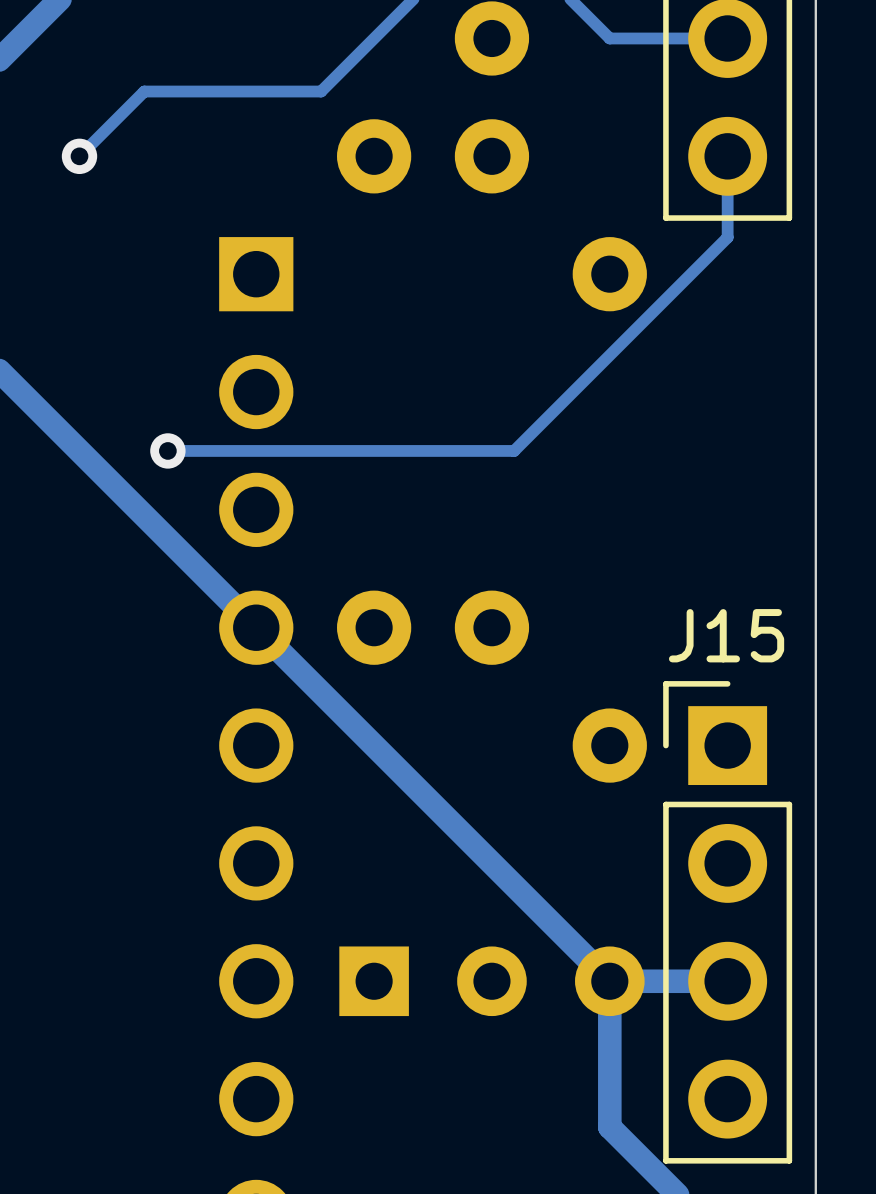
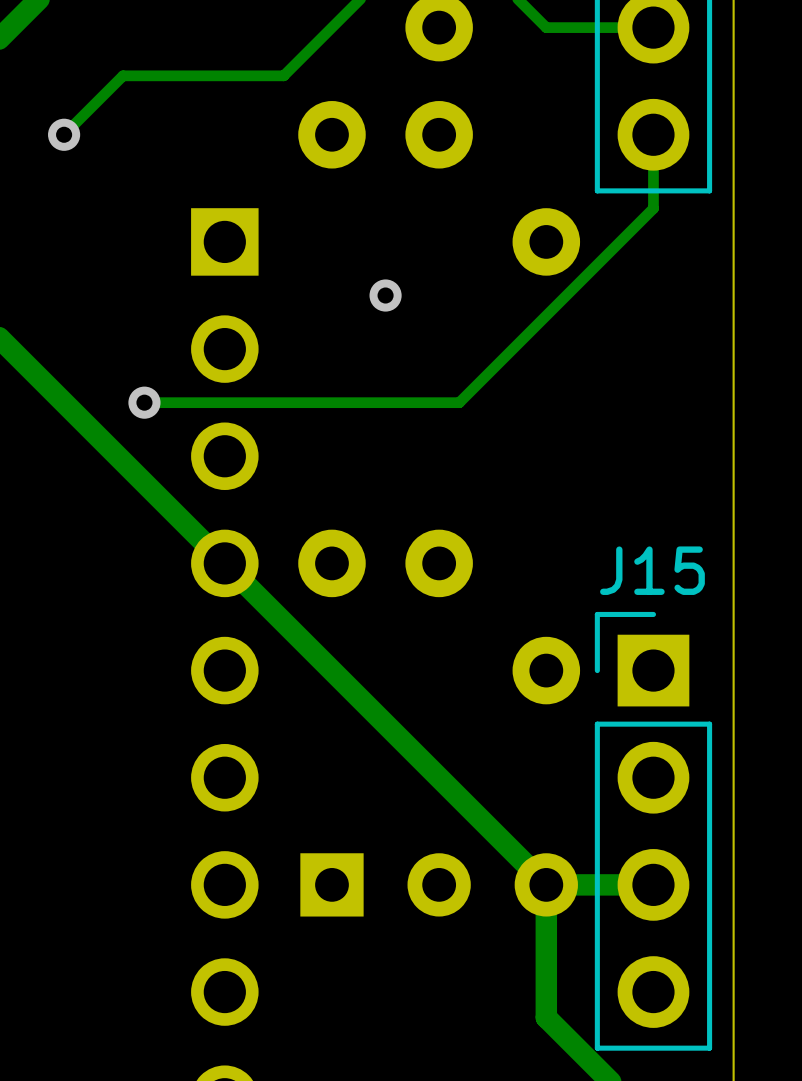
via: none -> (385, 295)

